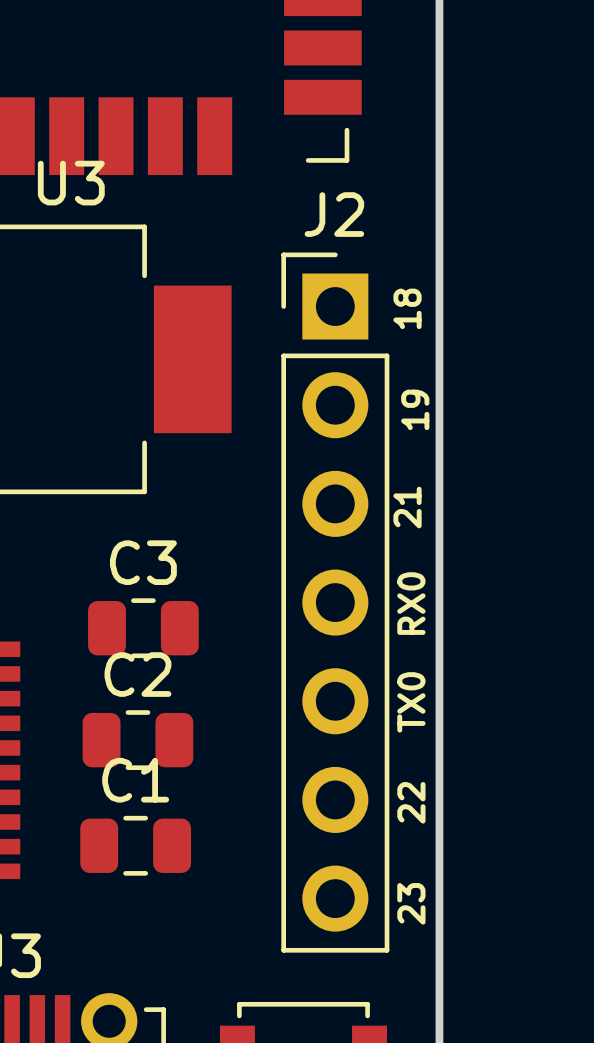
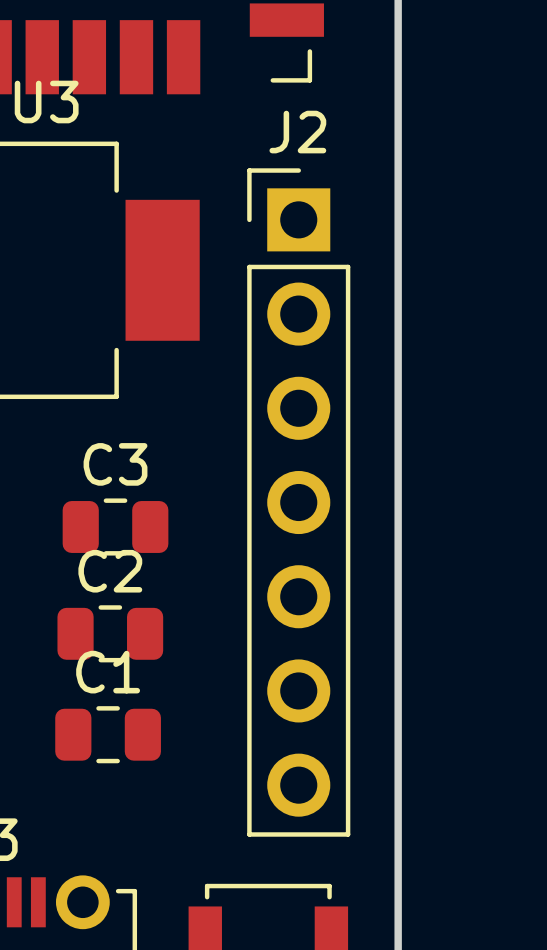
text: 18 (407, 308) -> none
text: 19 (415, 409) -> none
text: 21 (407, 507) -> none
text: RX0 (411, 603) -> none
text: TX0 (411, 702) -> none
text: 22 (411, 802) -> none
text: 23 (411, 903) -> none

